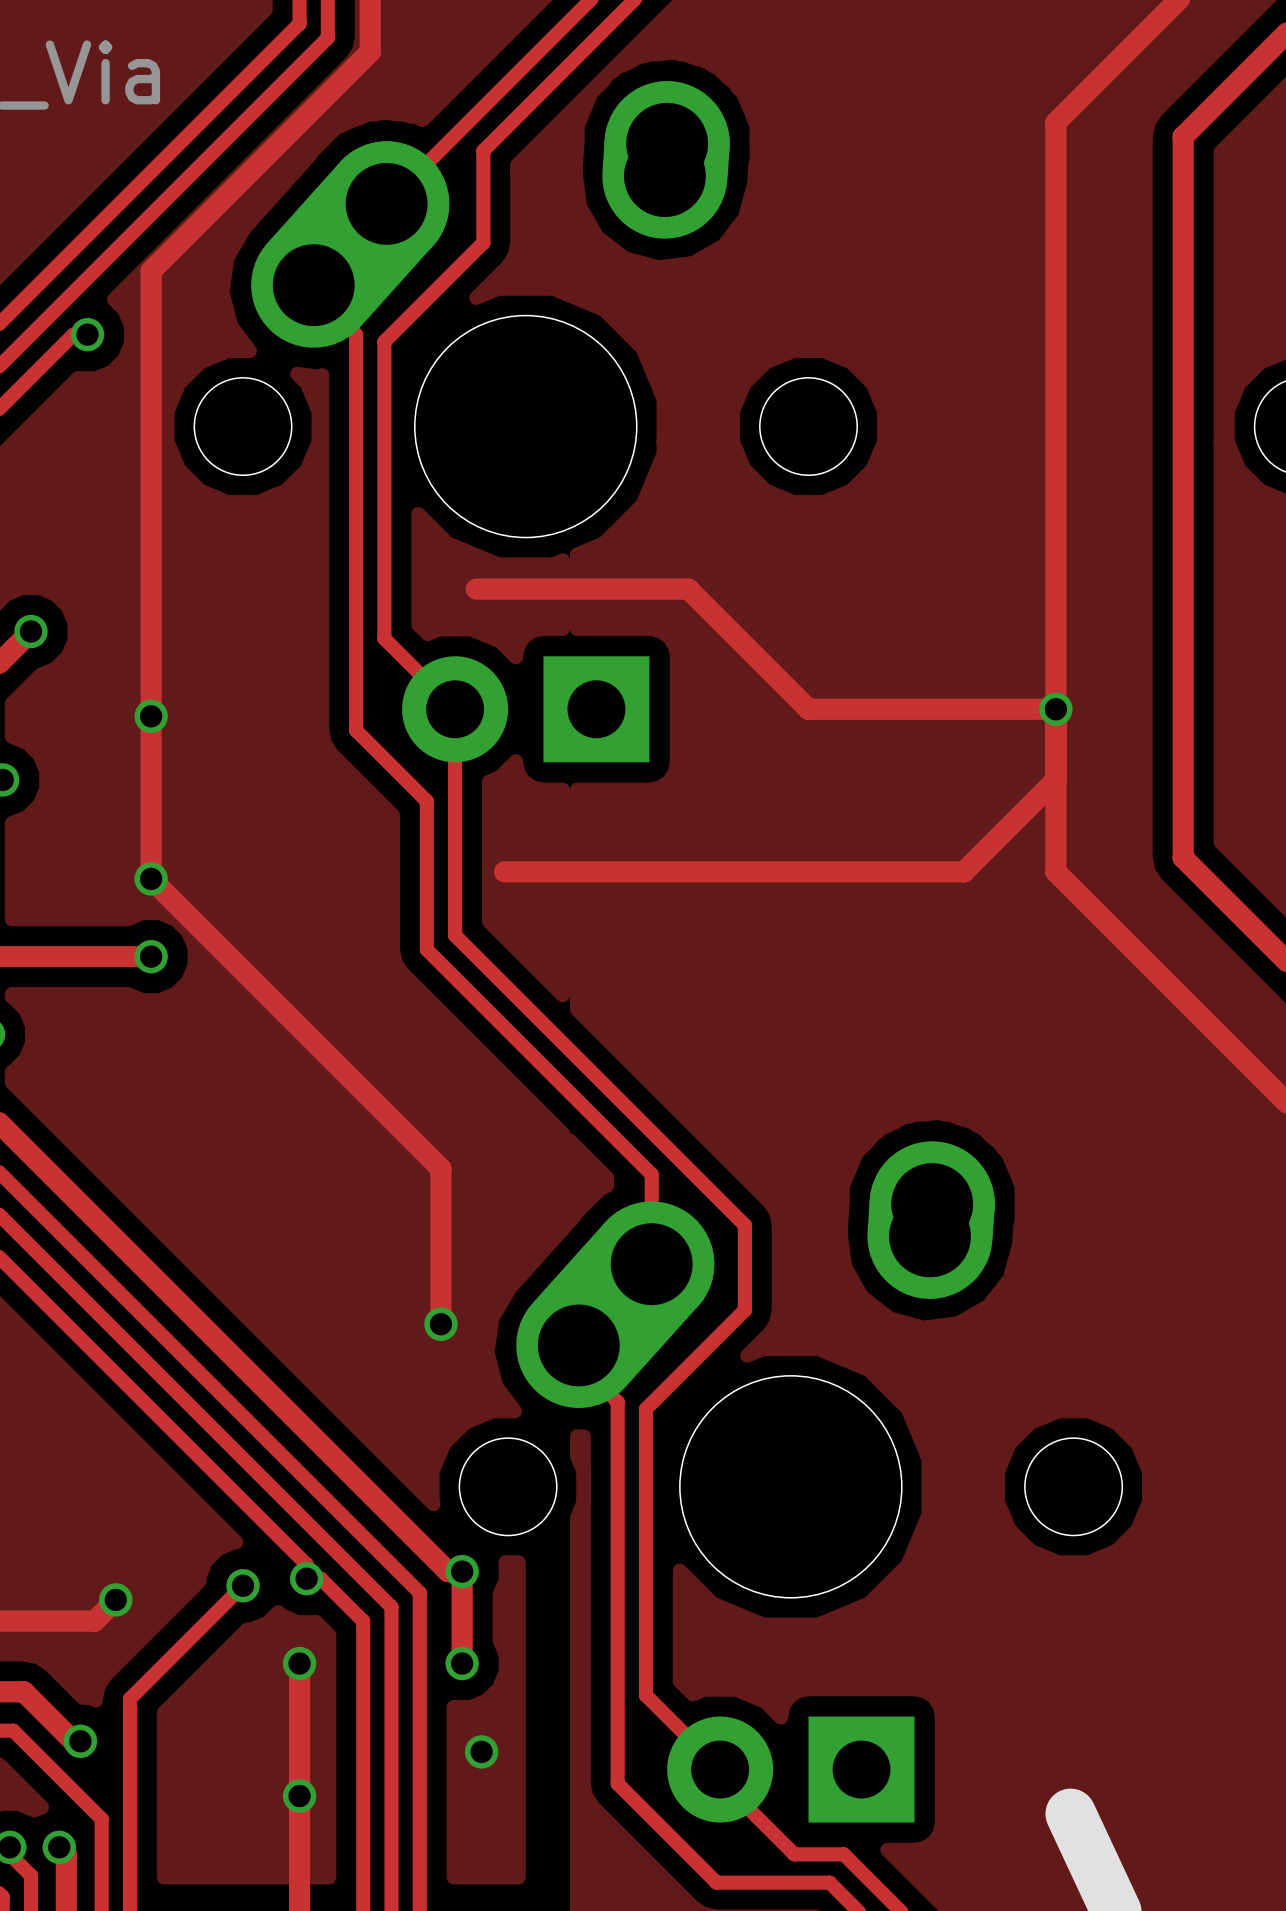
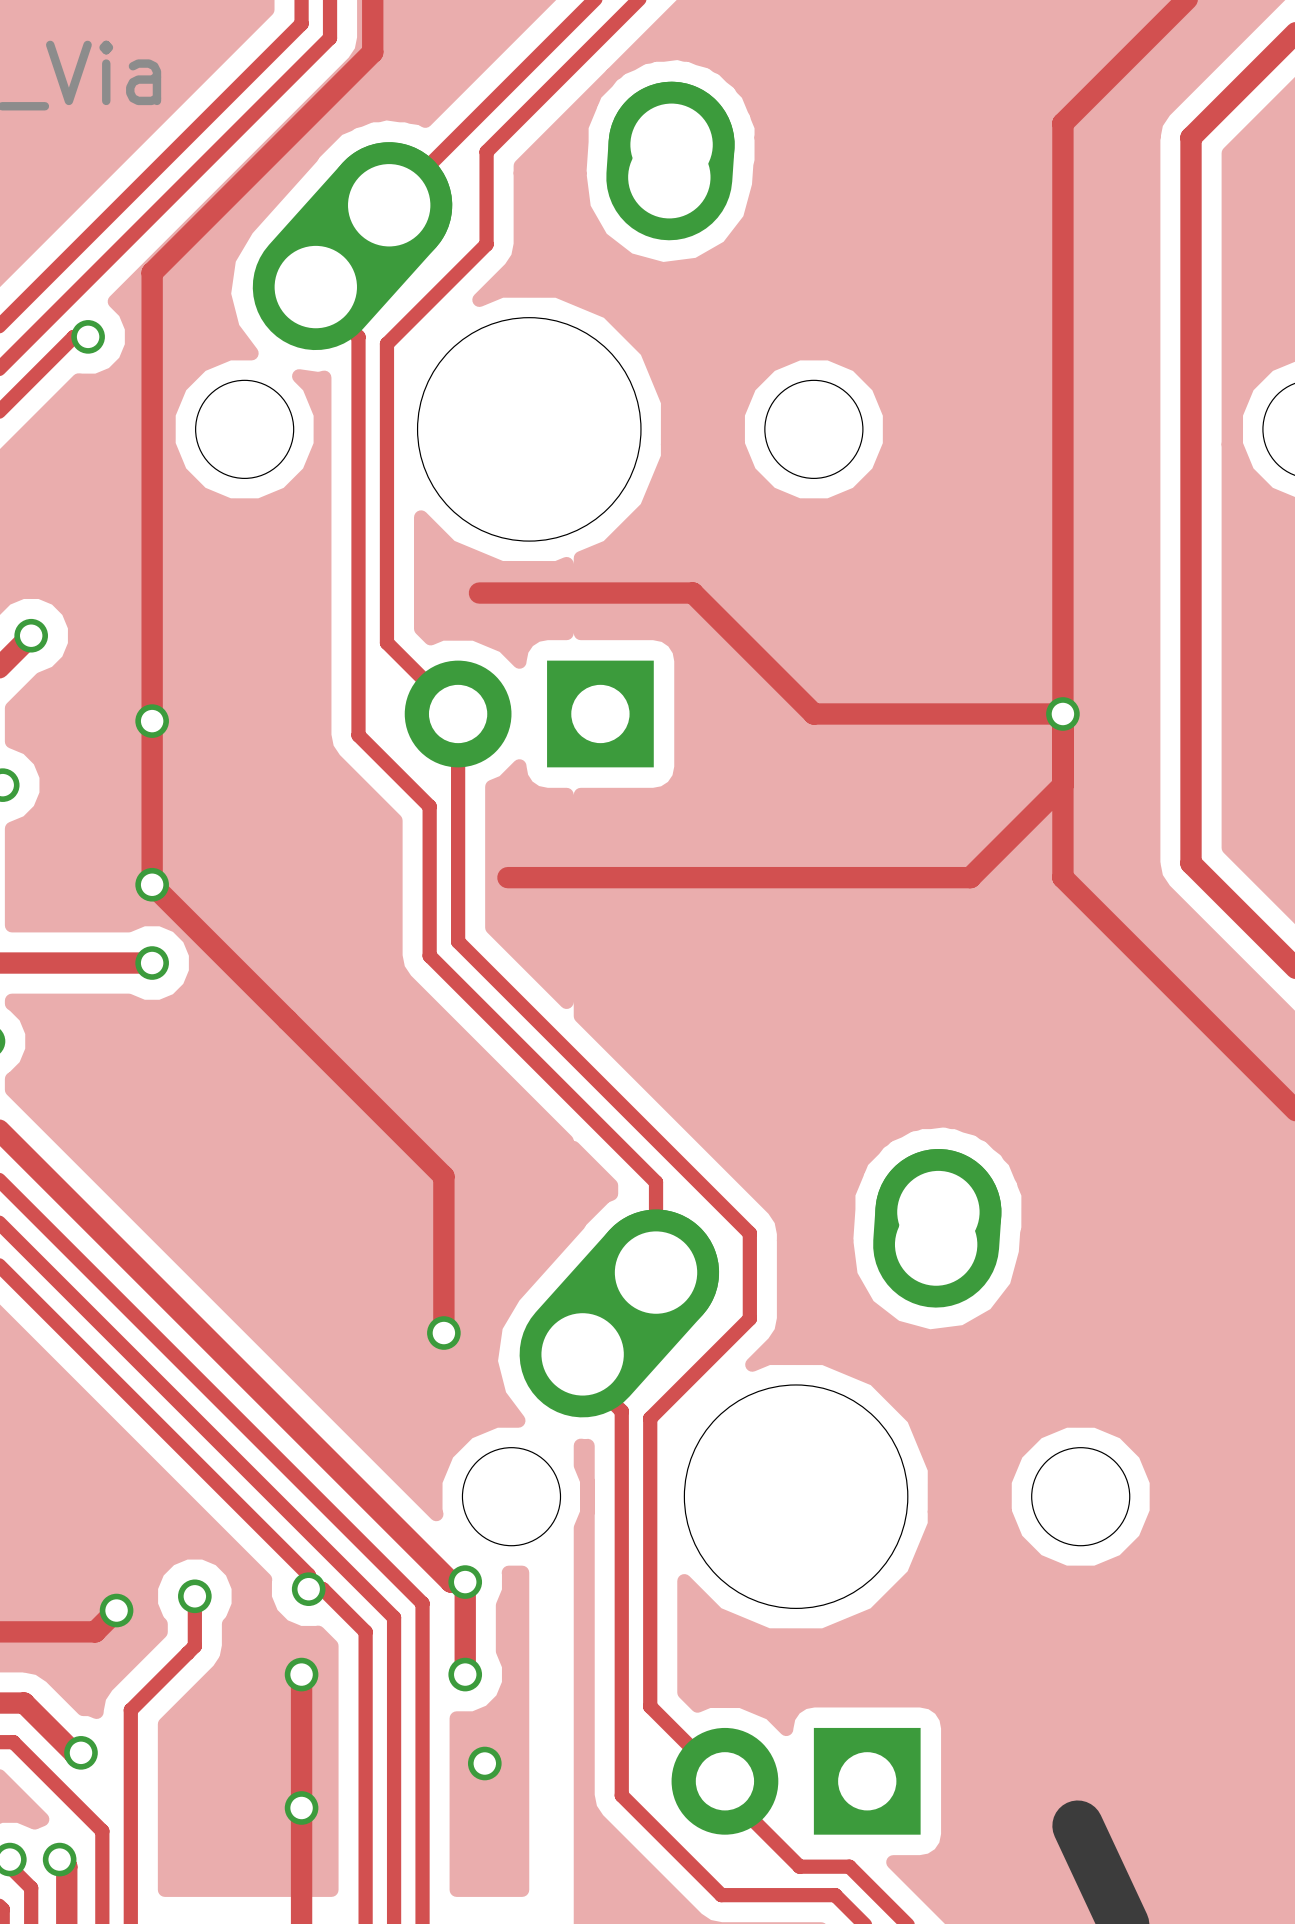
track: (243, 1585) (193, 1635) -> (194, 1596) (194, 1646)
via position: (243, 1585) -> (194, 1596)

